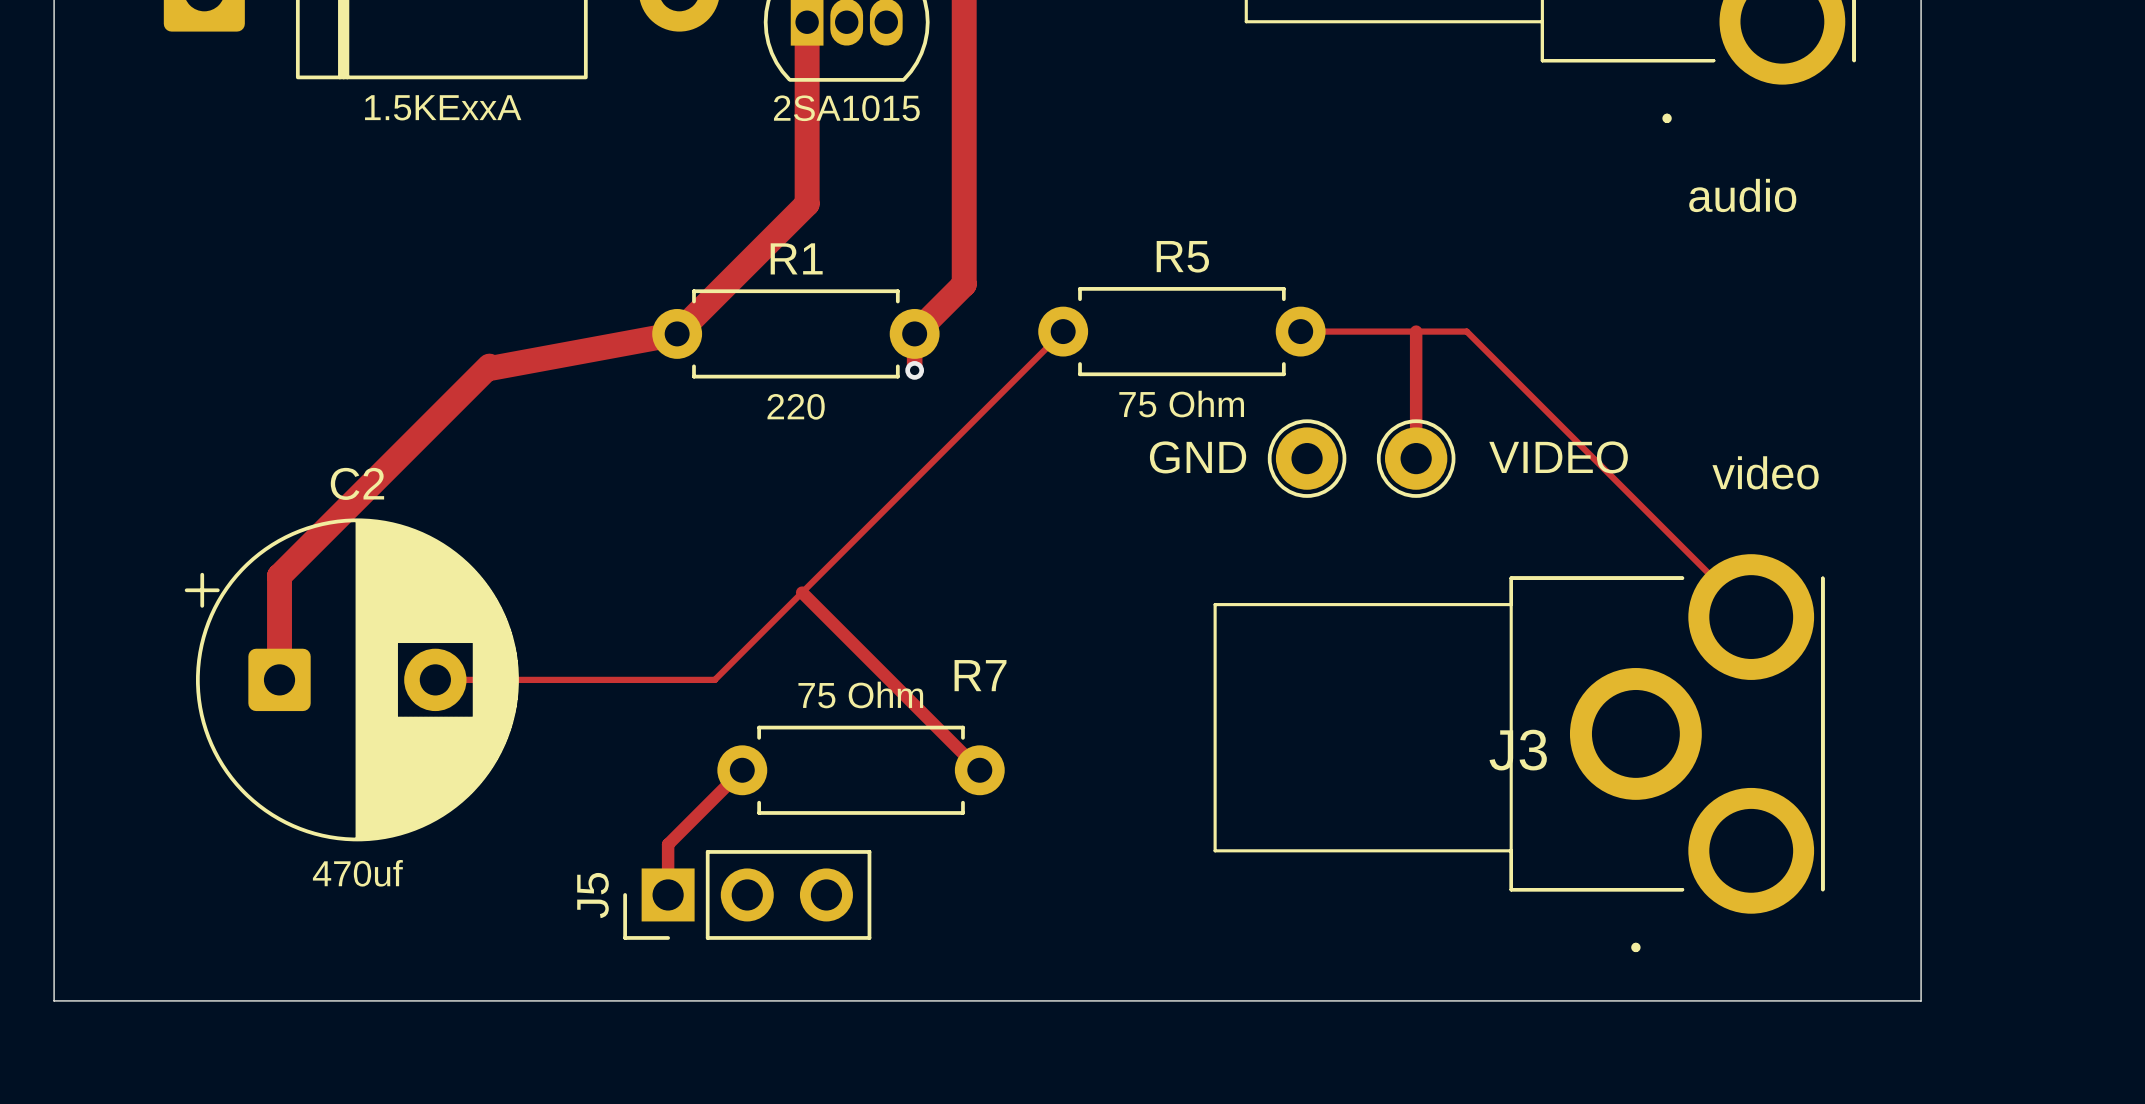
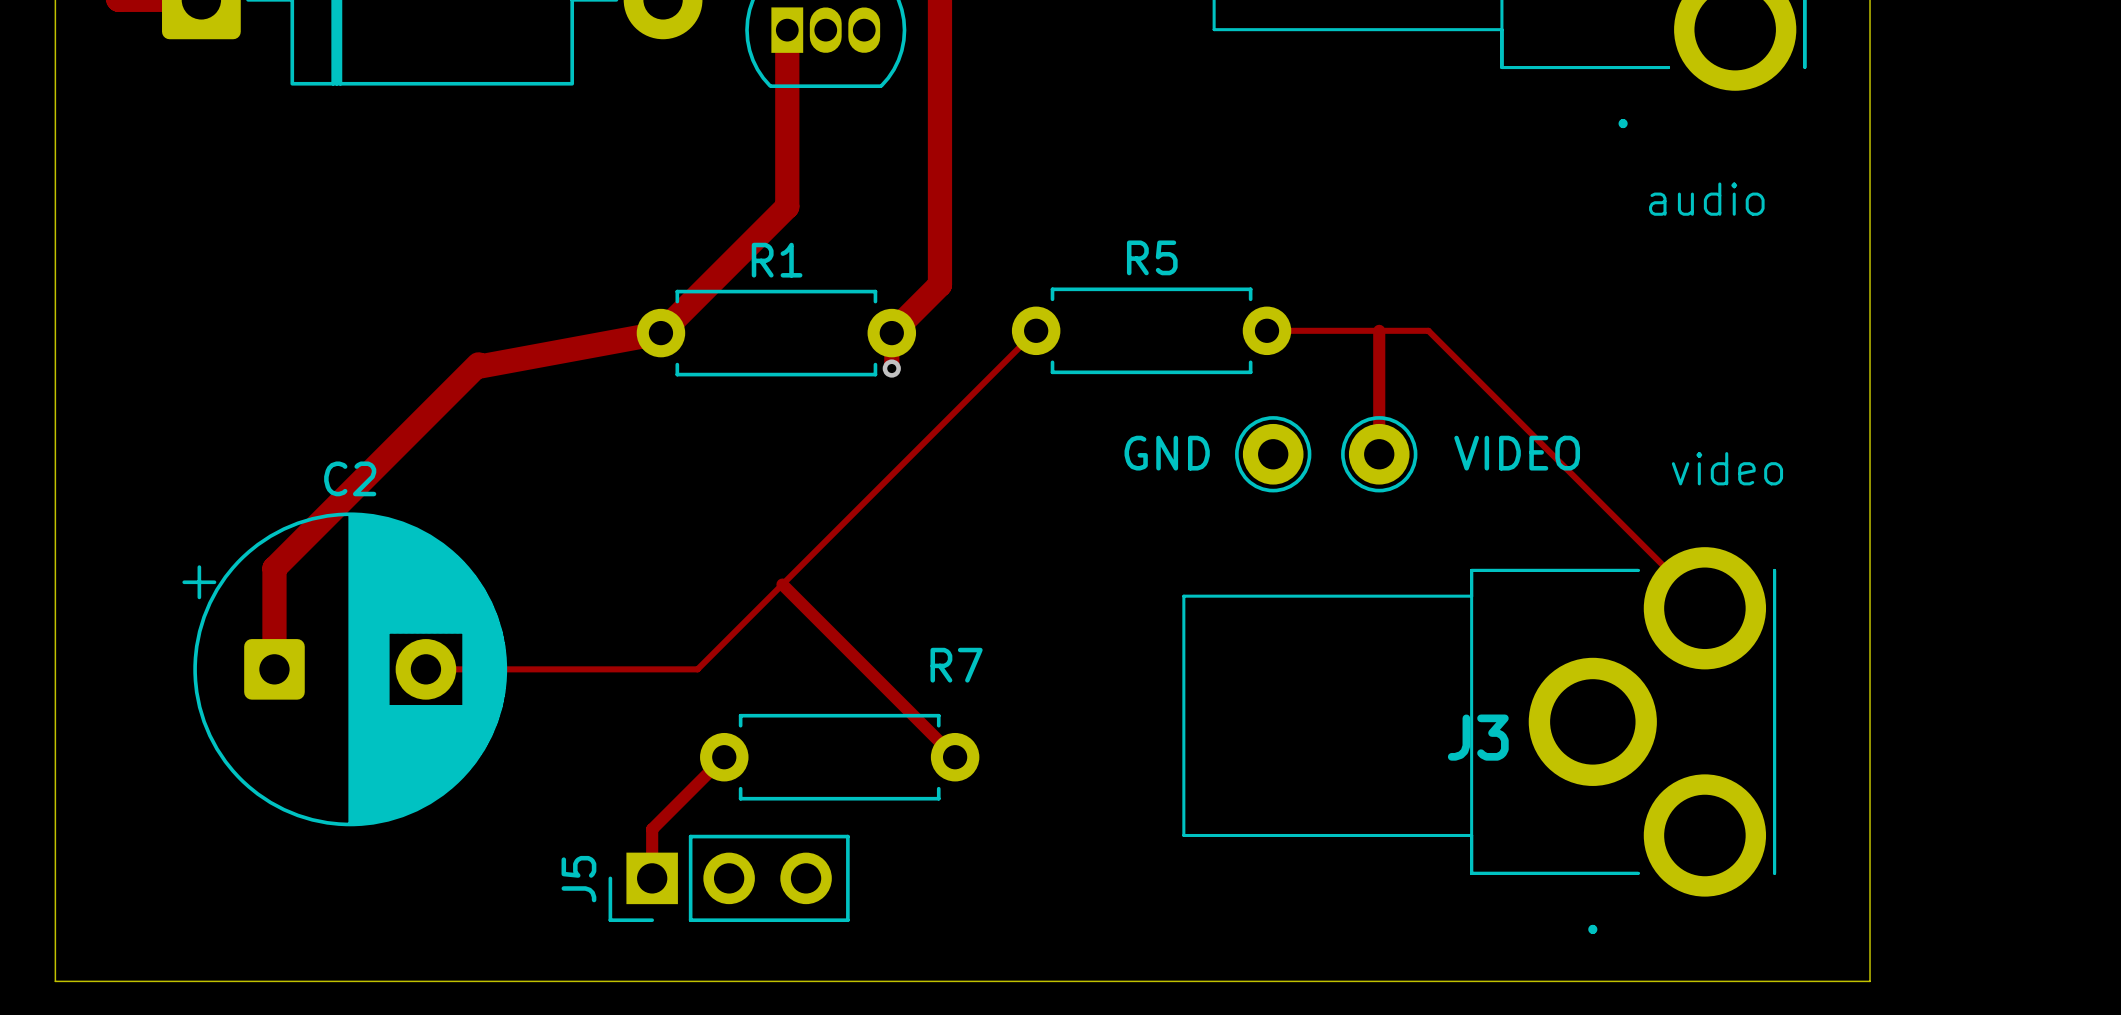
part value: 1.5KExxA (443, 107) -> none
part value: 2SA1015 (846, 108) -> none
R5 value: 75 Ohm (1181, 404) -> none
R1 value: 220 (796, 406) -> none
R7 value: 75 Ohm (860, 694) -> none
C2 value: 470uf (357, 873) -> none

